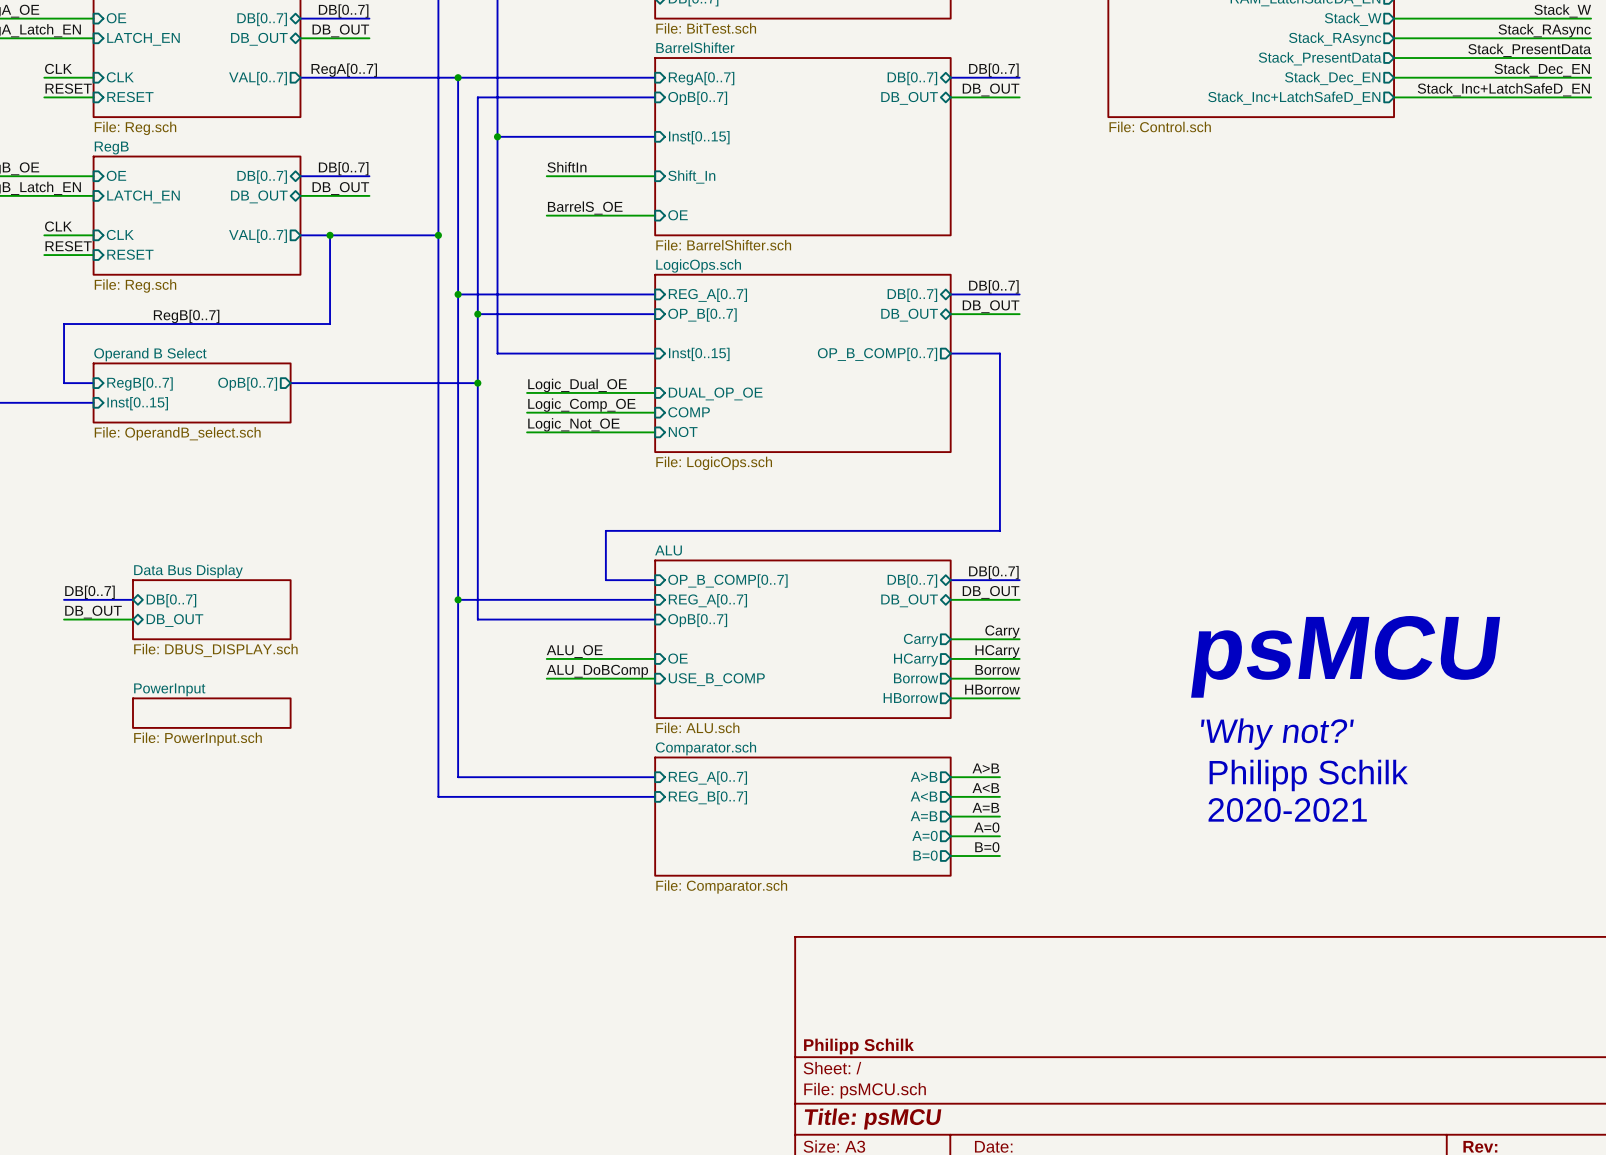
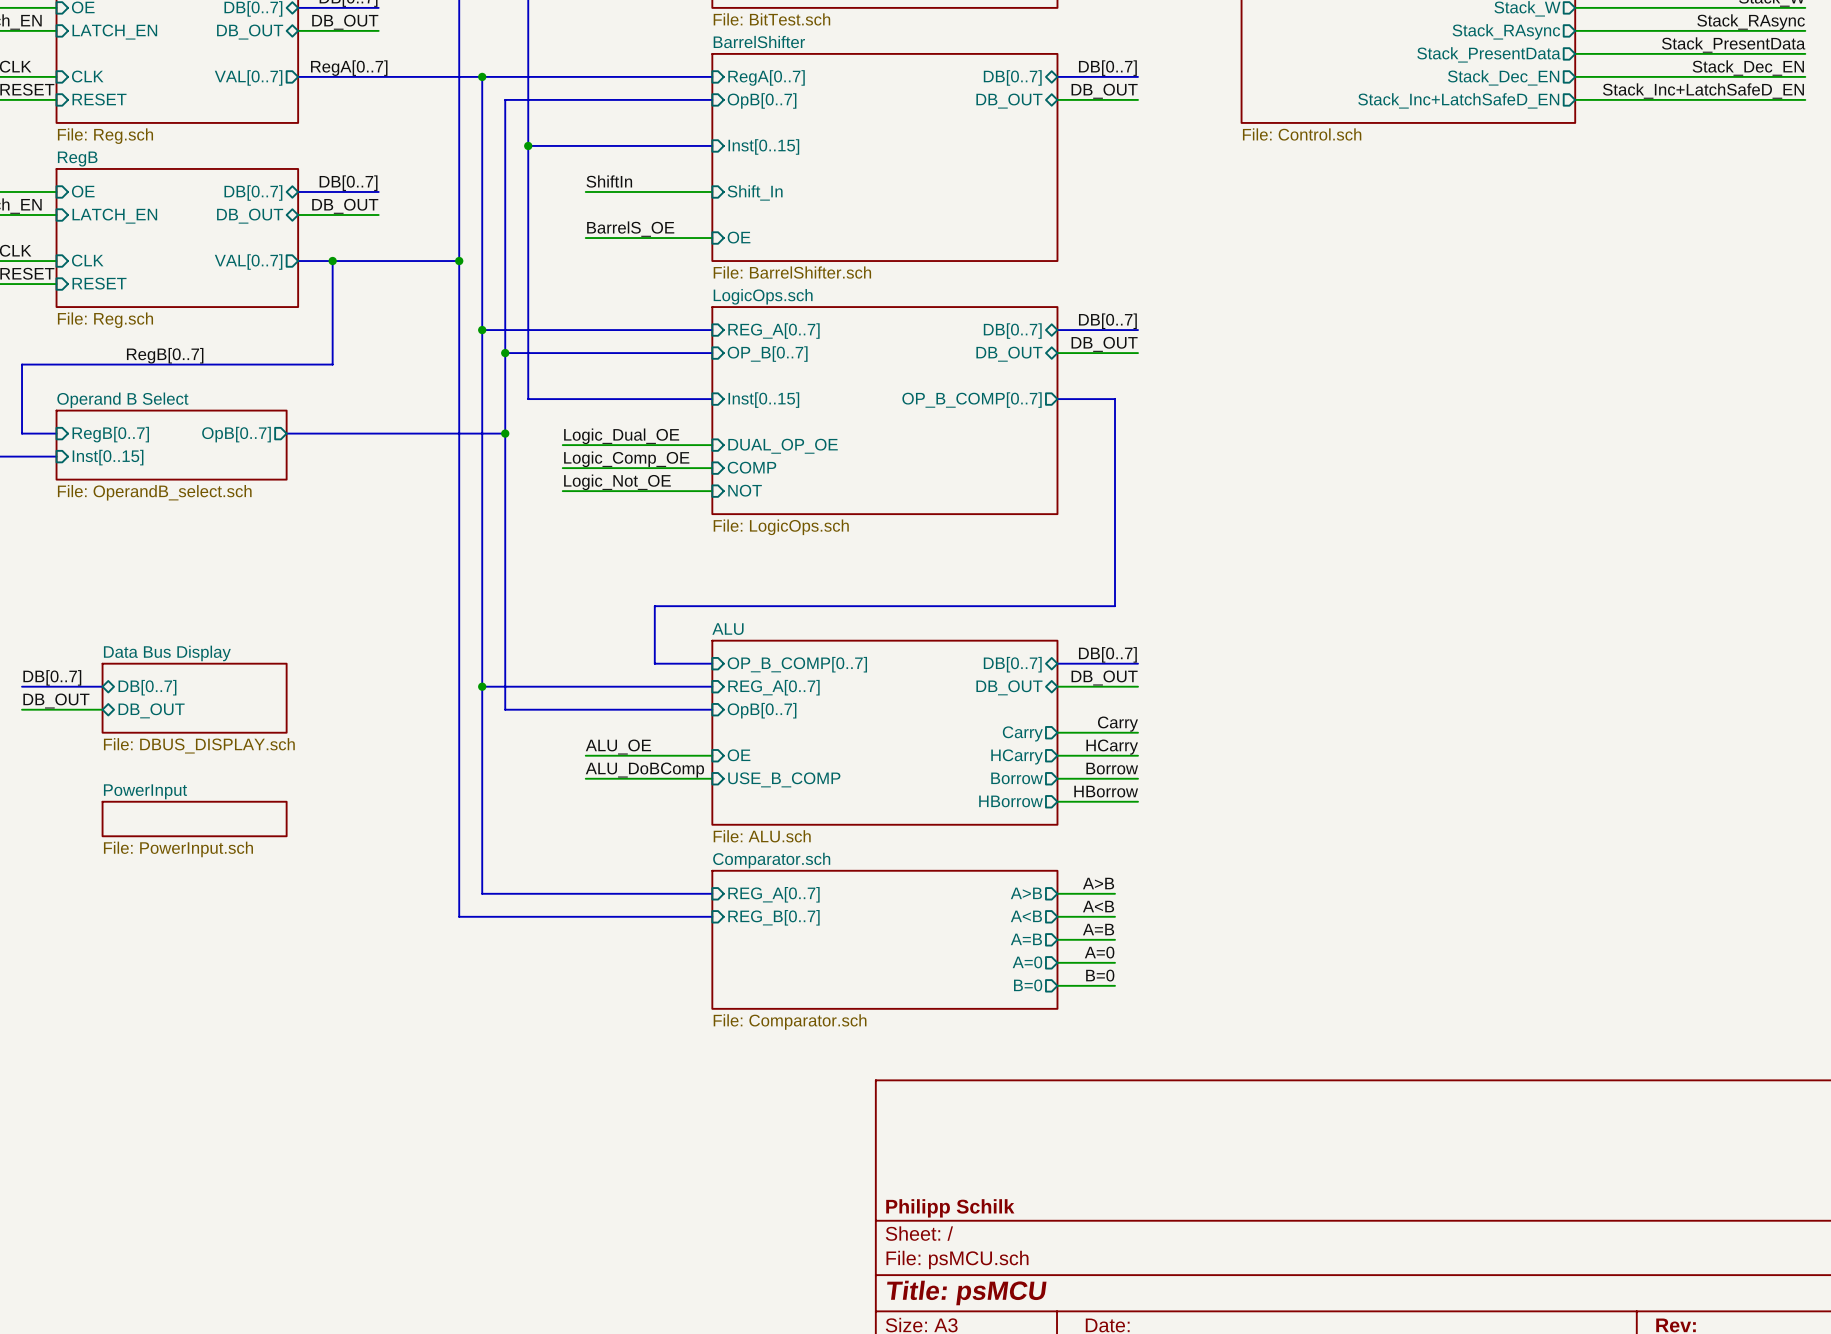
text: psMCU (1345, 656) -> none
text: 'Why not?' (1277, 734) -> none
text: Philipp Schilk (1308, 775) -> none
text: 2020-2021 (1287, 810) -> none

